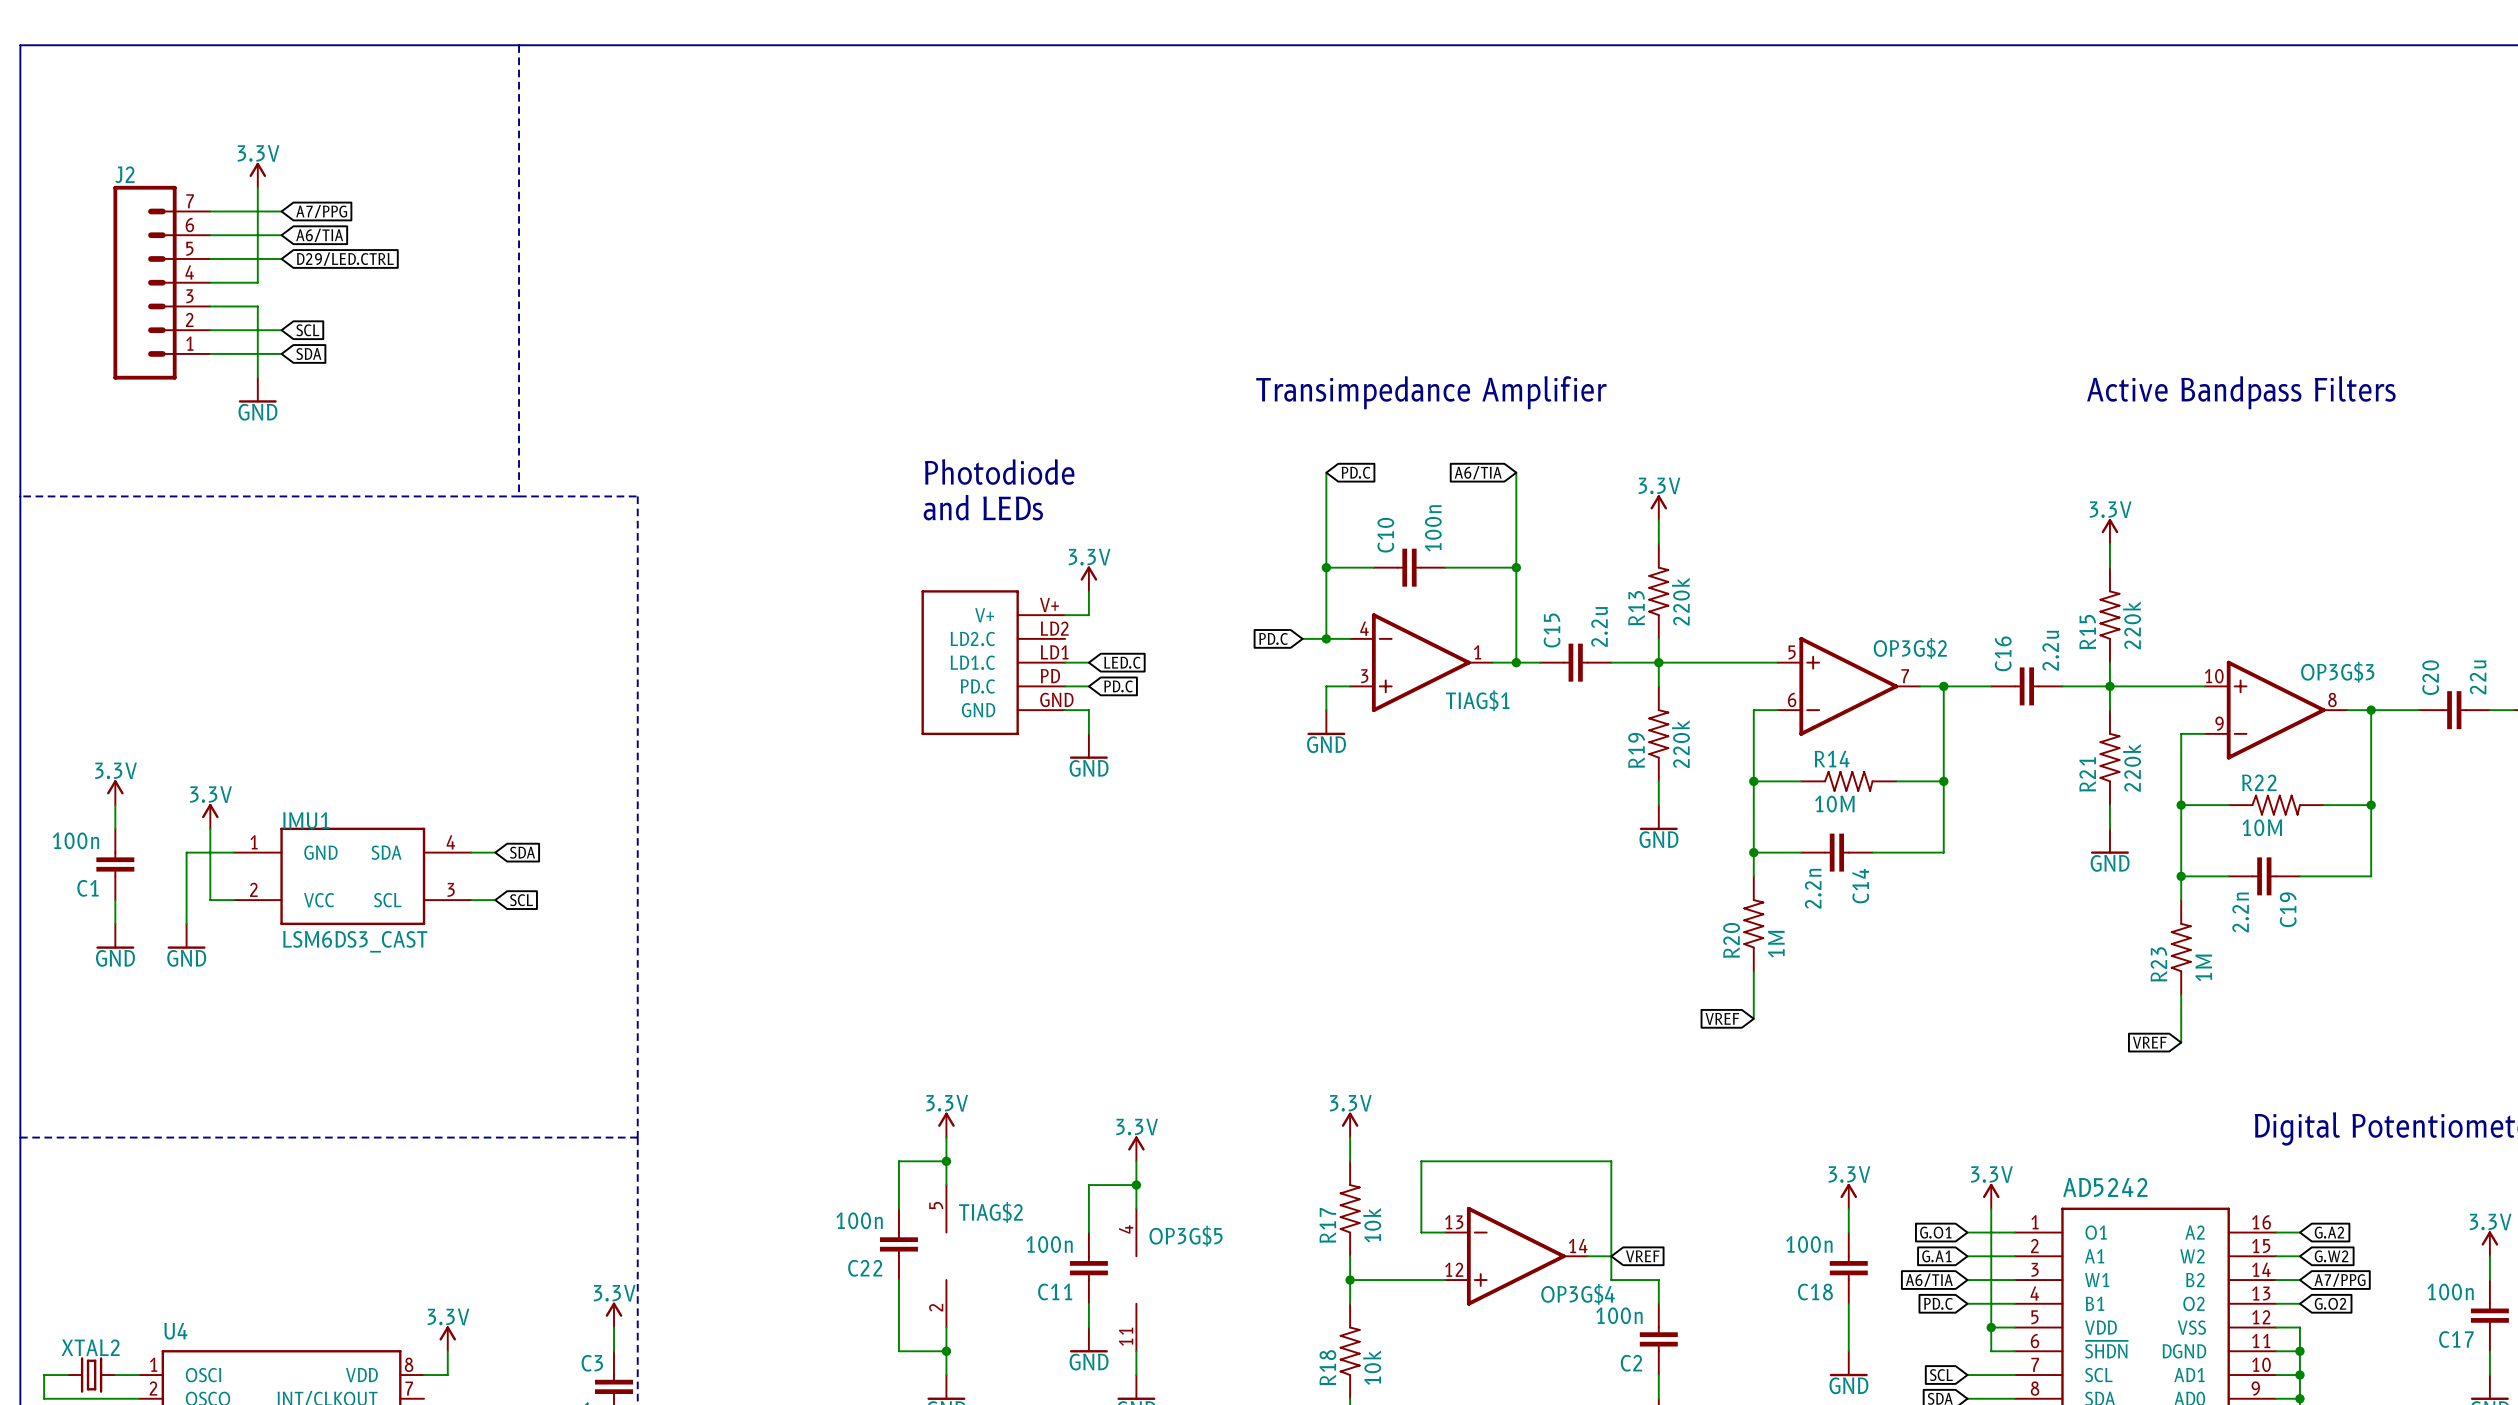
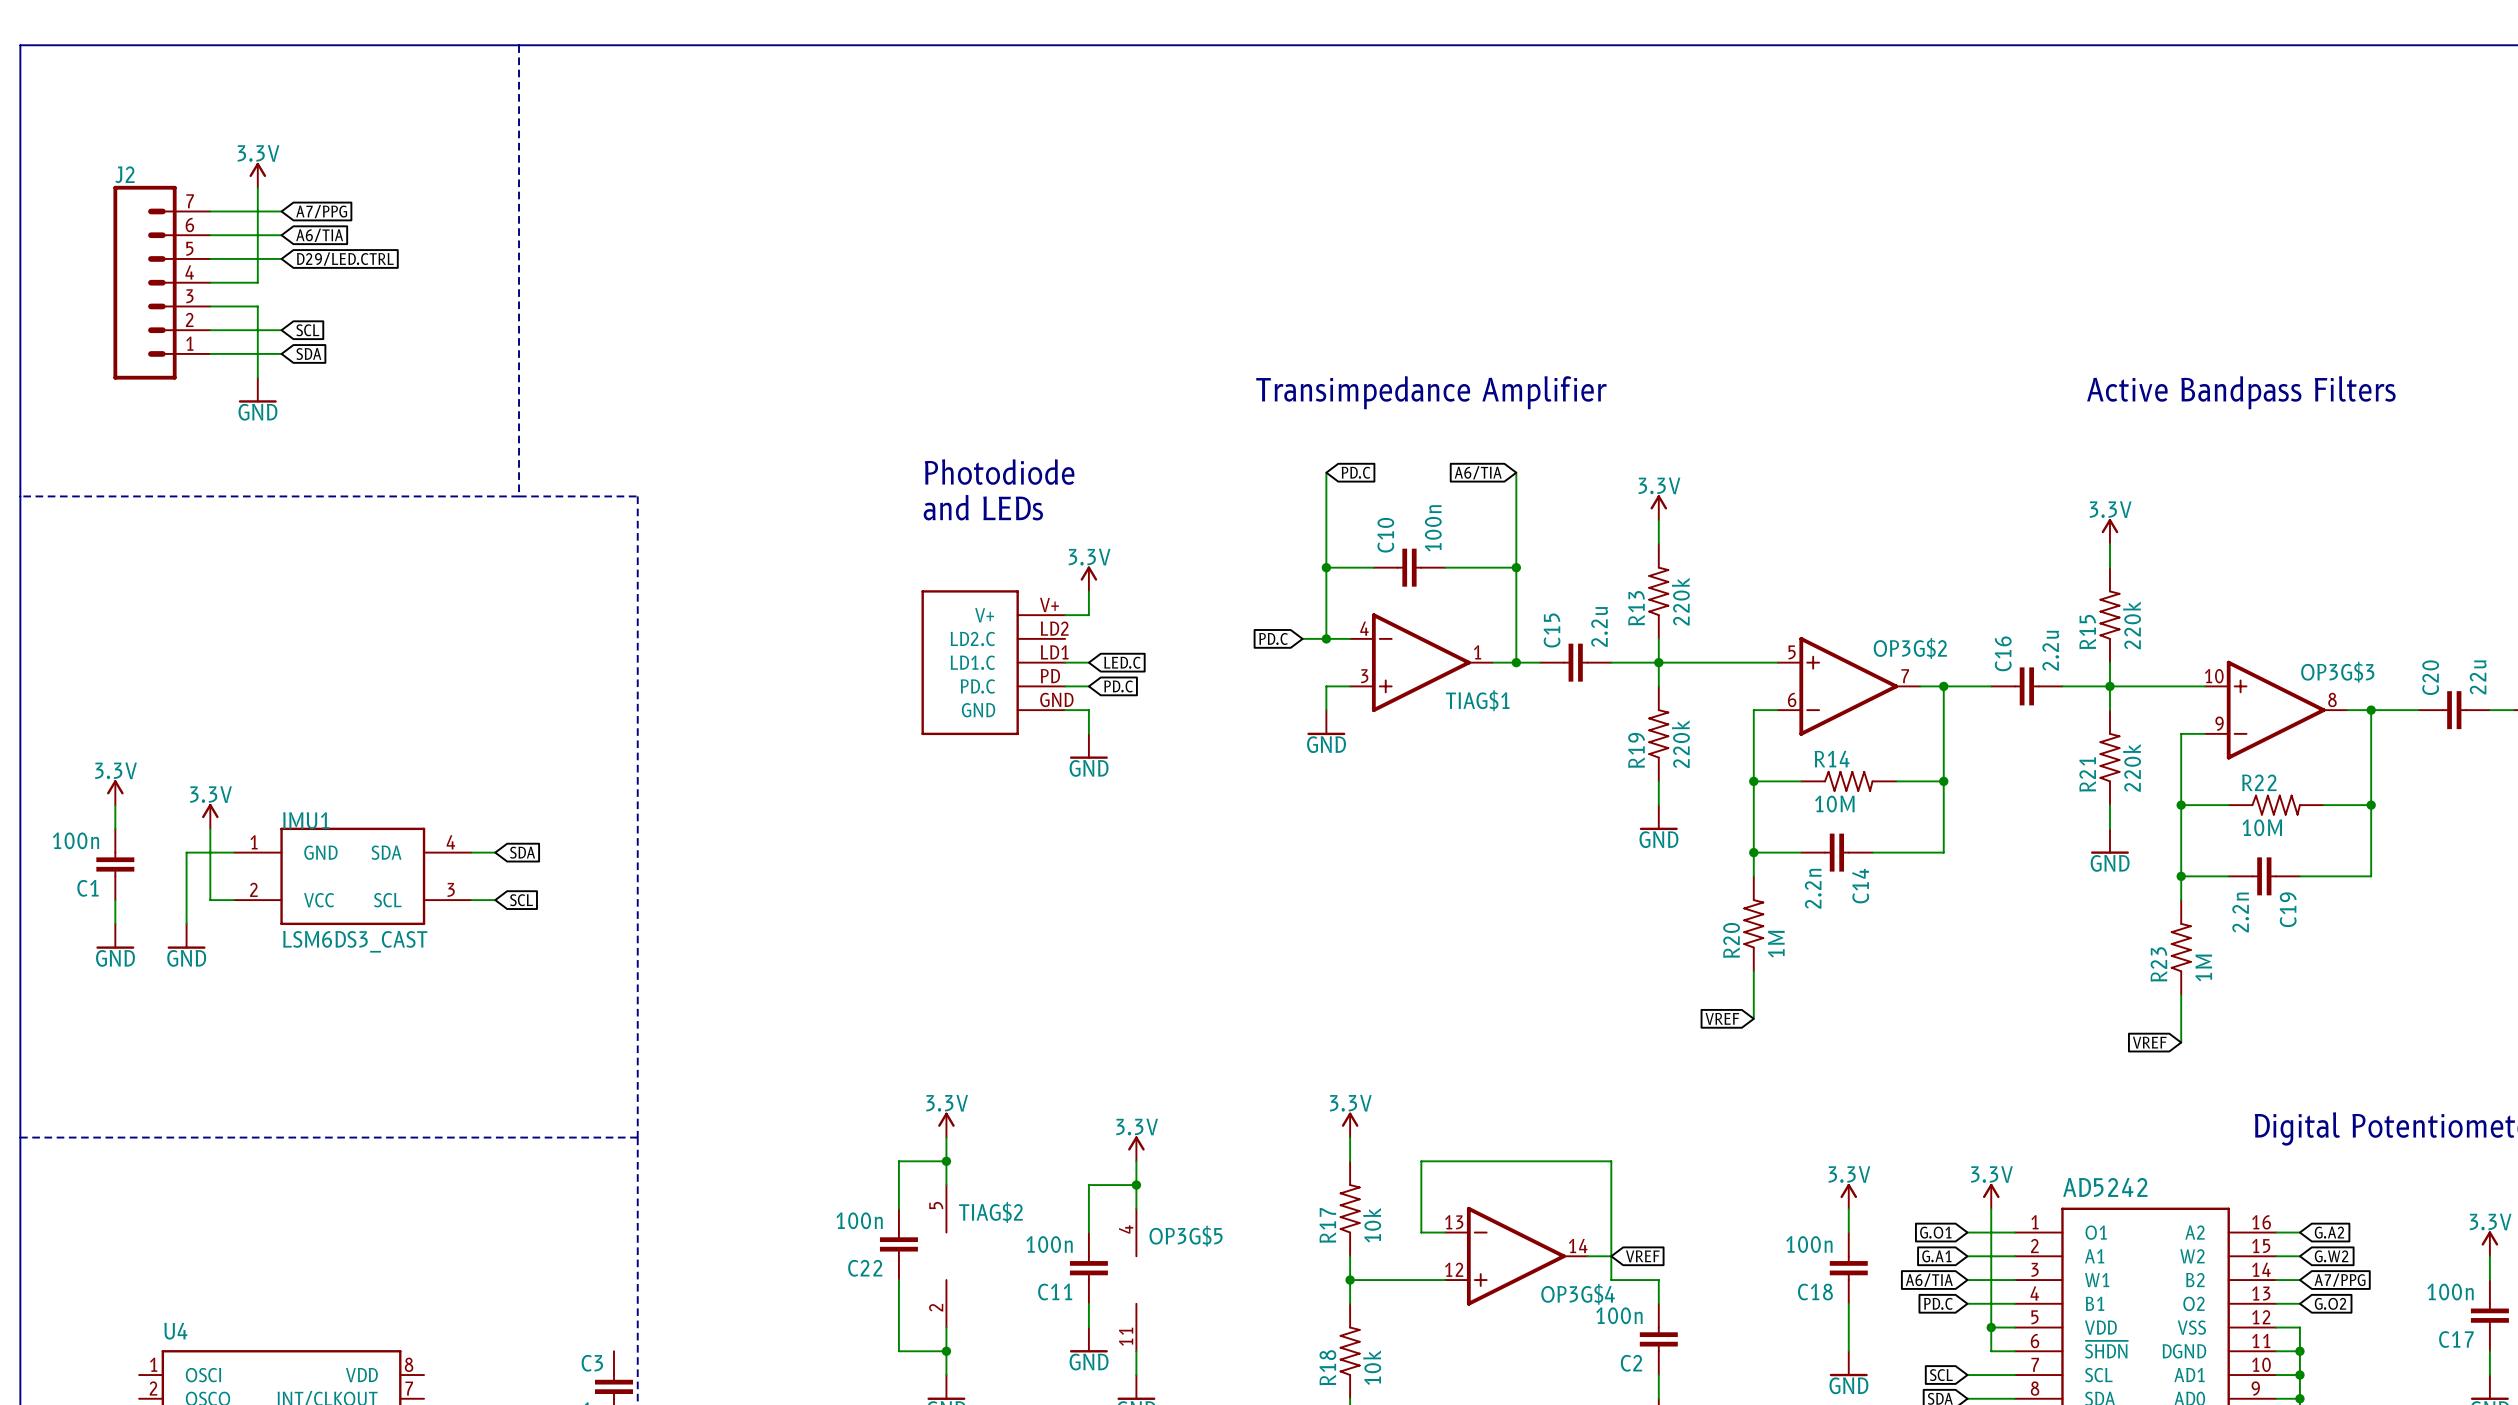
power symbol: 3.3V (614, 1315) -> none
wire: (614, 1327) (614, 1351) -> none
power symbol: 3.3V (447, 1338) -> none
wire: (447, 1351) (447, 1375) (424, 1375) -> none
wire: (67, 1375) (44, 1375) (44, 1398) (139, 1398) -> none
XTAL2: (91, 1375) -> none
wire: (115, 1375) (139, 1375) -> none

